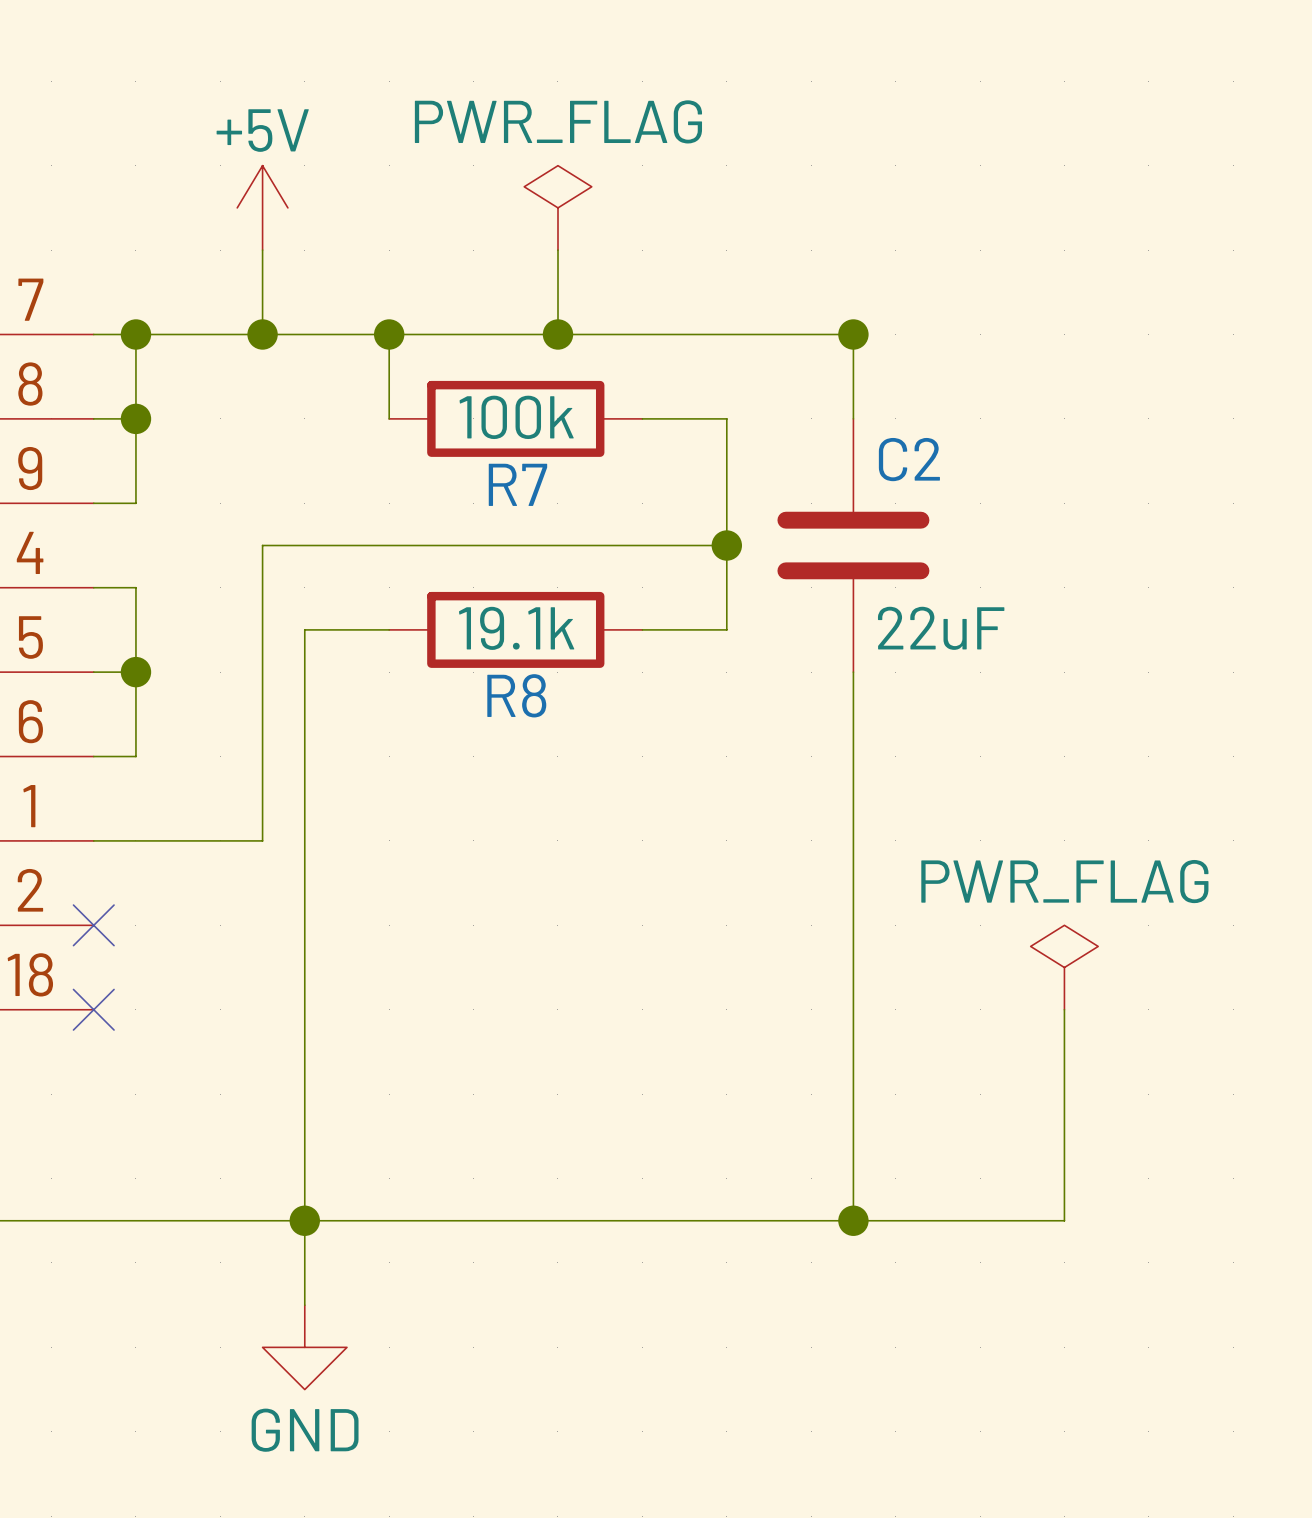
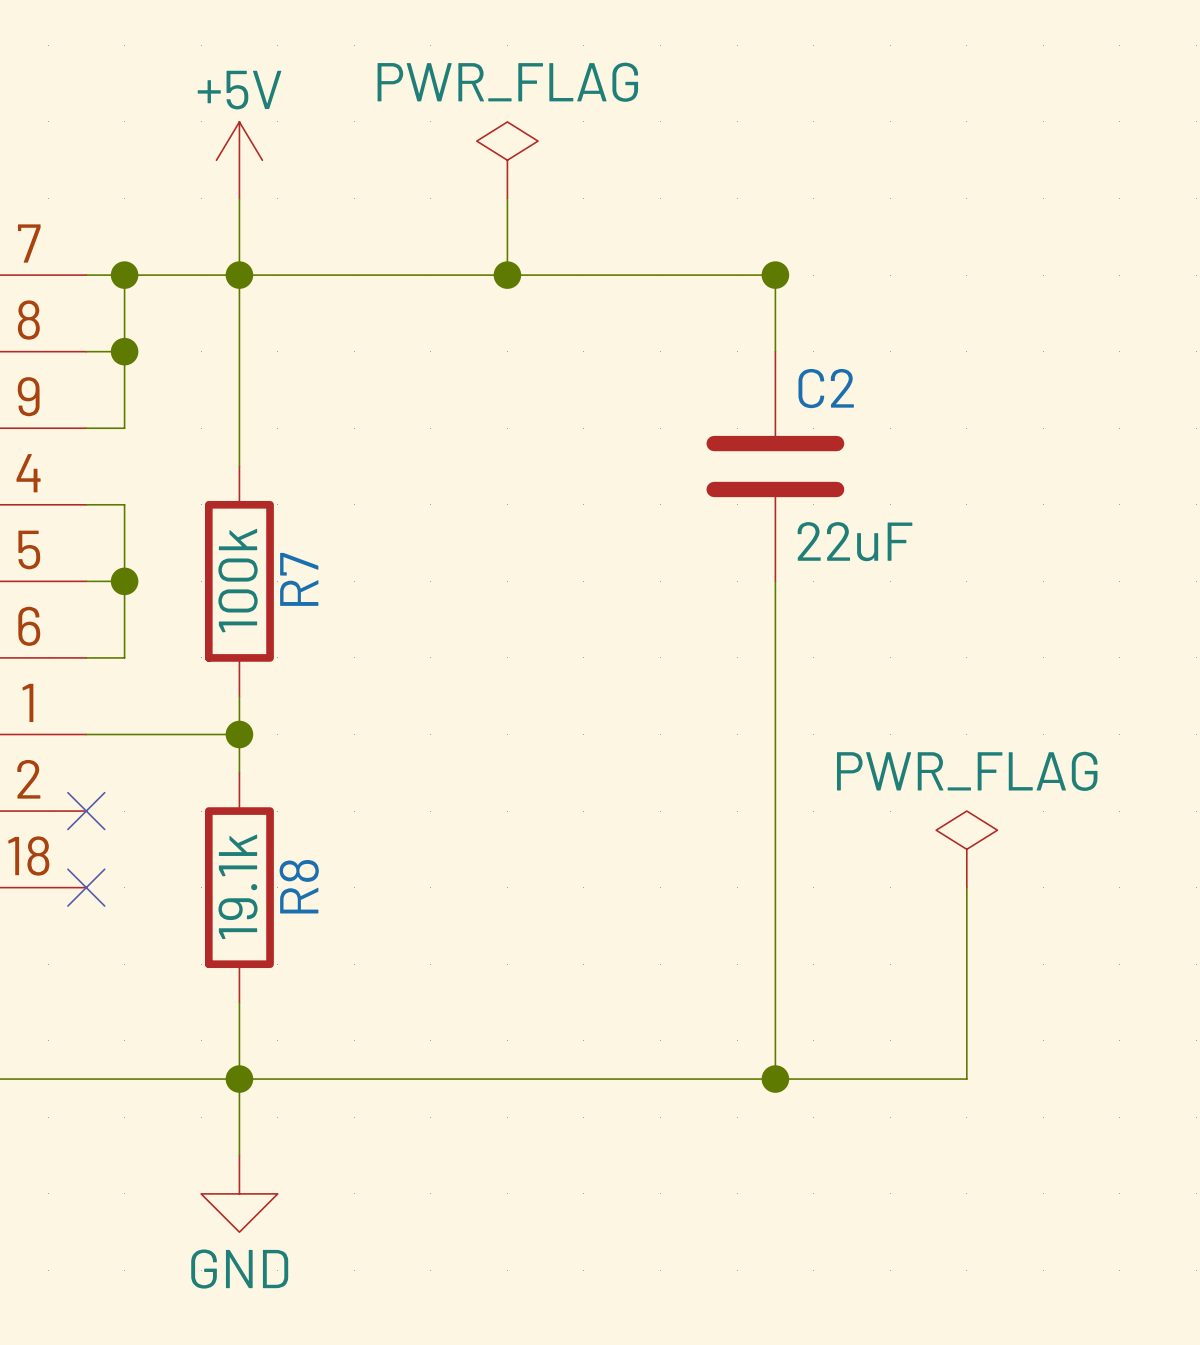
wire: none -> (239, 275) (239, 466)
wire: (389, 334) (389, 418) -> none
junction: (389, 334) -> none
R7 rotation: 0° (515, 418) -> 90° clockwise (239, 581)
R7 position: (515, 418) -> (239, 581)
wire: (642, 418) (726, 418) (726, 629) (642, 629) -> none
R7 name position: R7 (517, 484) -> R7 (299, 579)
wire: (726, 545) (262, 545) (262, 798) -> none
junction: (726, 545) -> none
wire: (389, 629) (304, 629) (304, 1305) -> none
R8 rotation: 0° (515, 629) -> 90° clockwise (239, 887)
R8 position: (515, 629) -> (239, 887)
R8 name position: R8 (516, 695) -> R8 (299, 886)
wire: none -> (239, 734) (239, 772)
junction: none -> (239, 734)
wire: none -> (239, 1002) (239, 1155)
junction position: (304, 1220) -> (239, 1079)
power symbol position: GND (304, 1347) -> GND (239, 1193)

